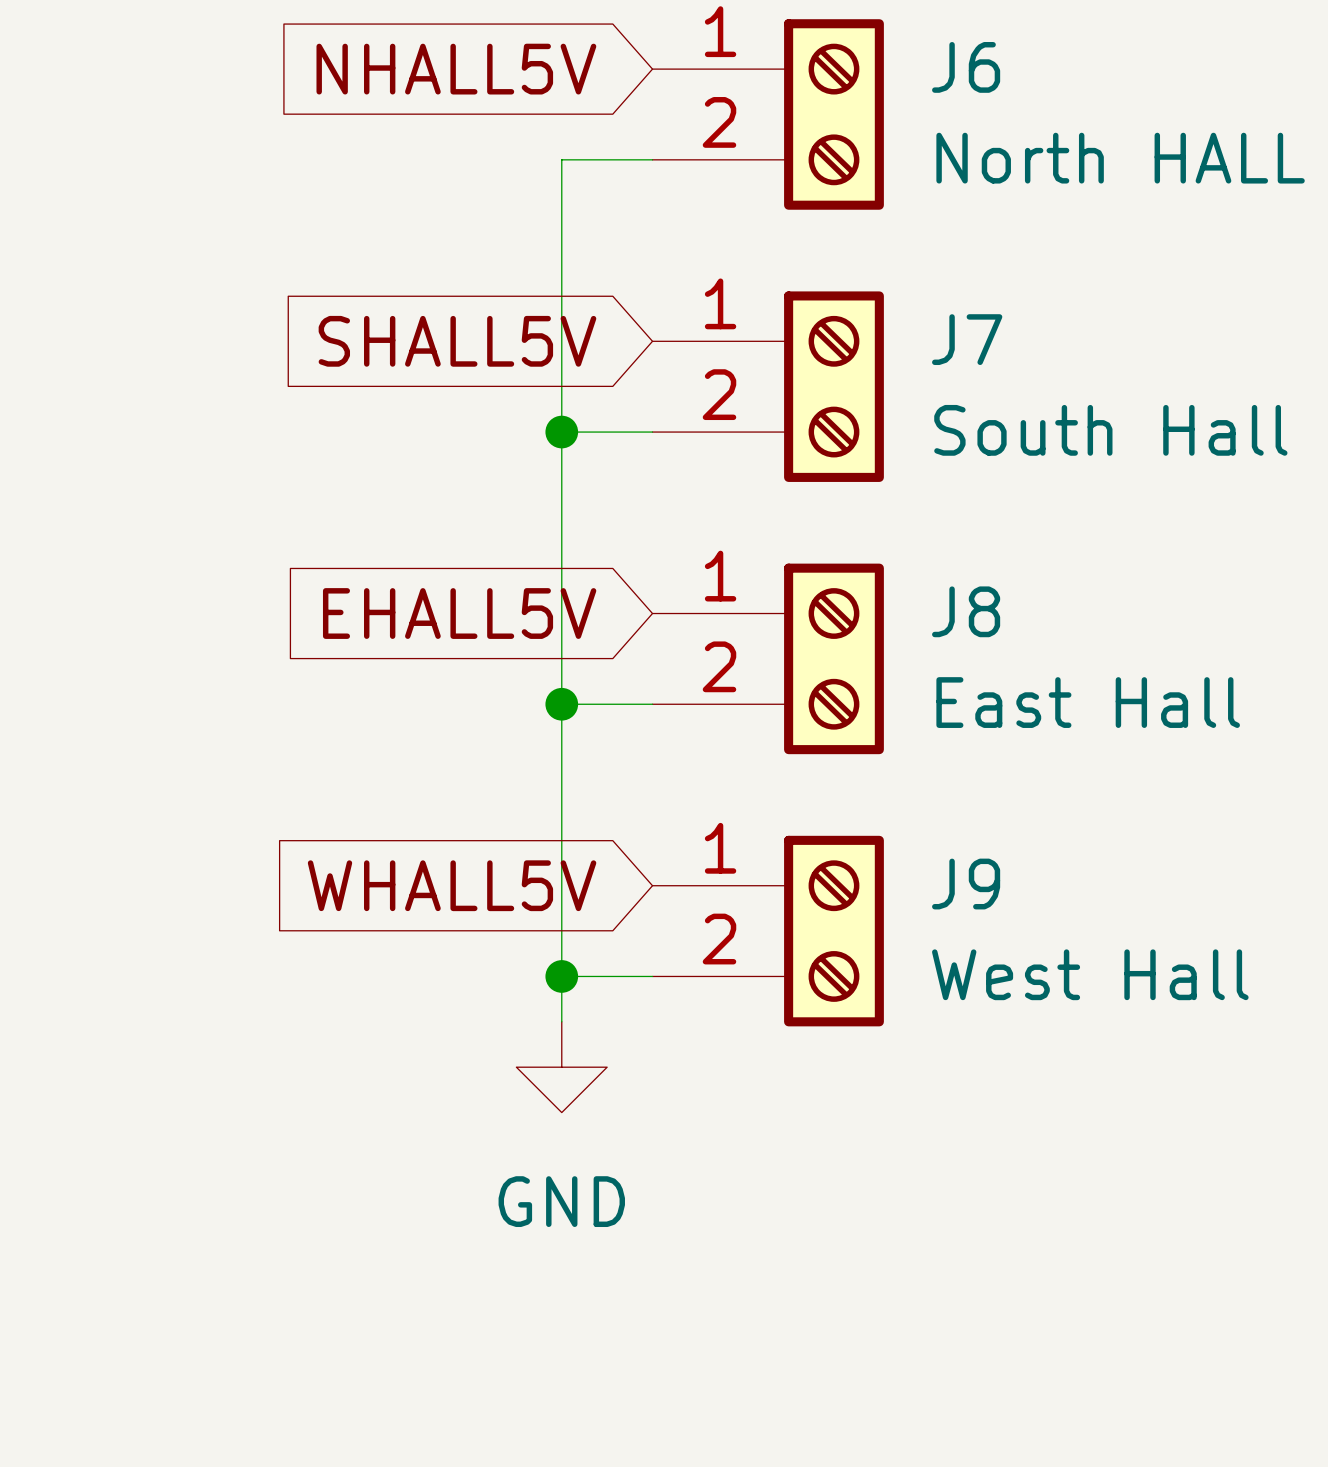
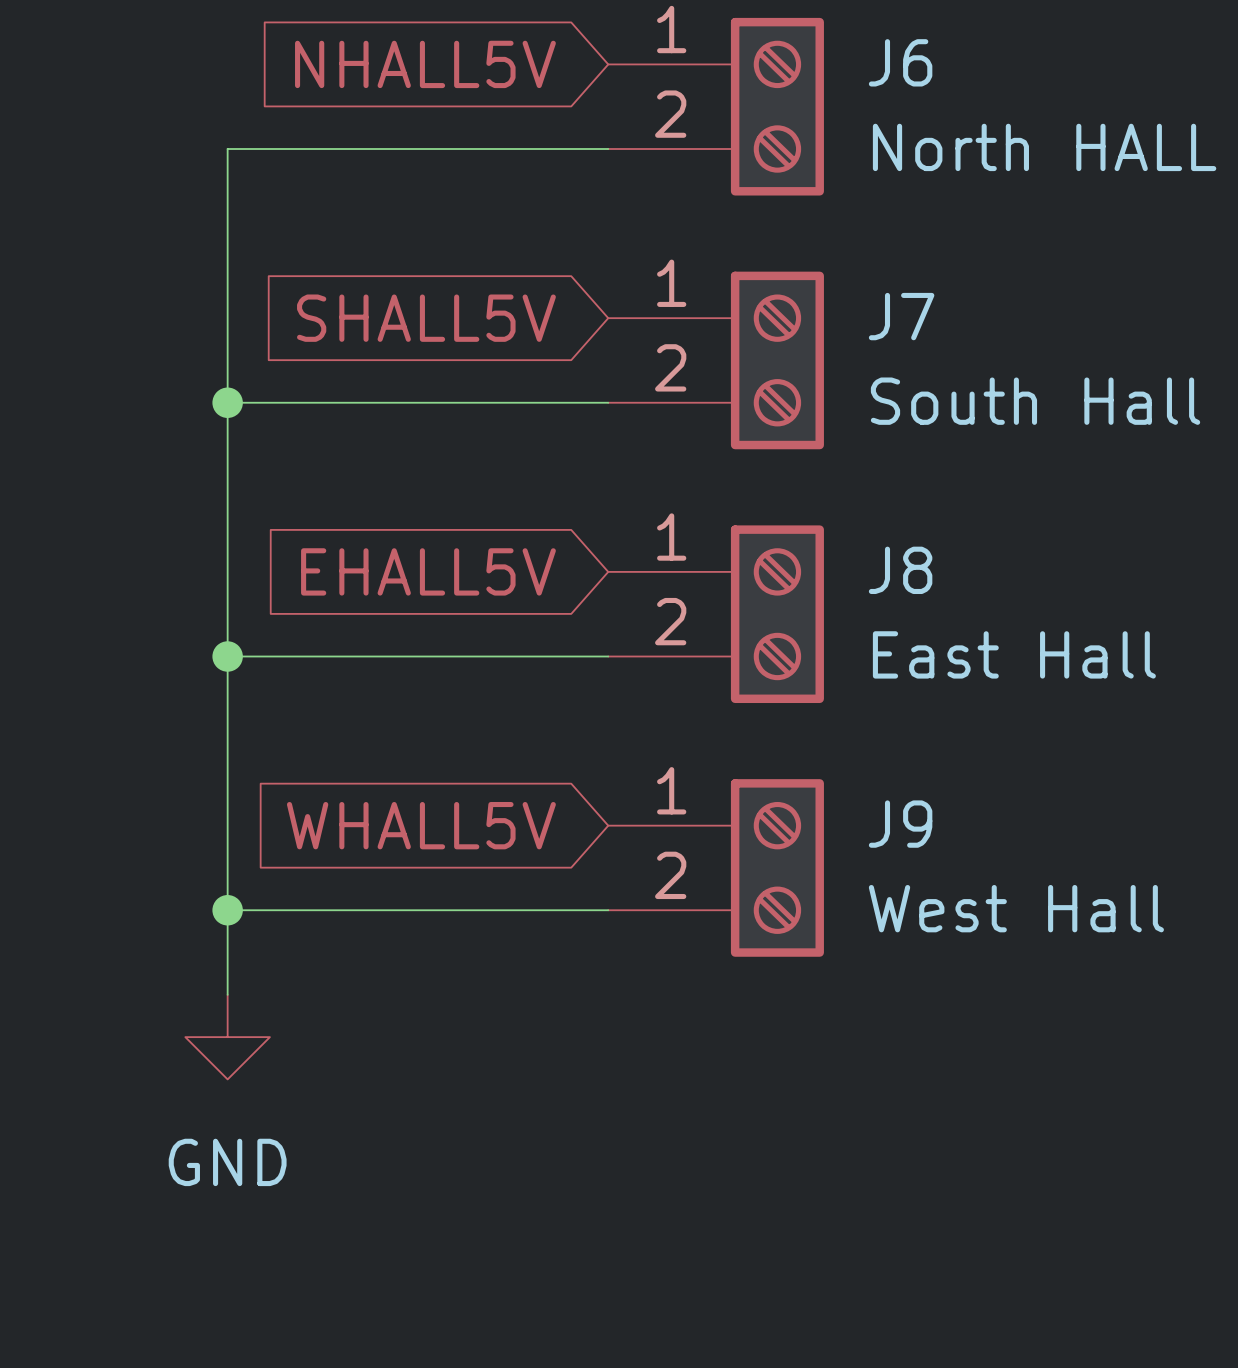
wire: (561, 159) (561, 1021) -> (523, 149) (227, 149) (227, 994)
wire: none -> (227, 402) (523, 402)
junction: none -> (227, 402)
junction: (561, 432) -> none
wire: none -> (227, 656) (523, 656)
junction: none -> (227, 656)
junction: (561, 704) -> none
wire: none -> (227, 910) (523, 910)
junction: none -> (227, 910)
junction: (561, 976) -> none
power symbol position: GND (561, 1067) -> GND (227, 1037)

